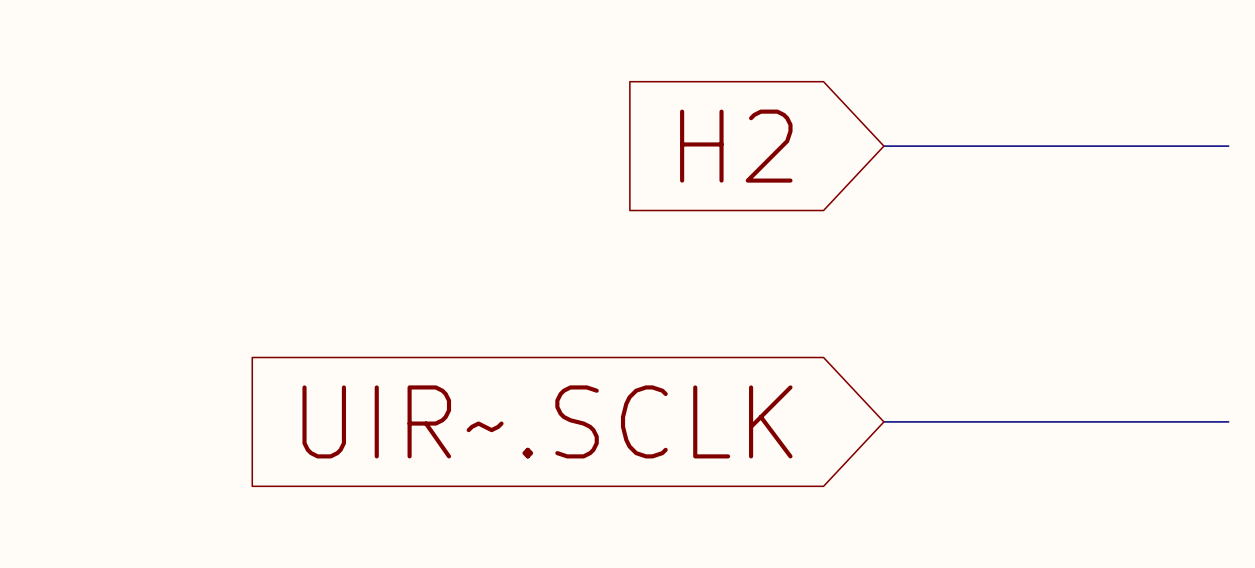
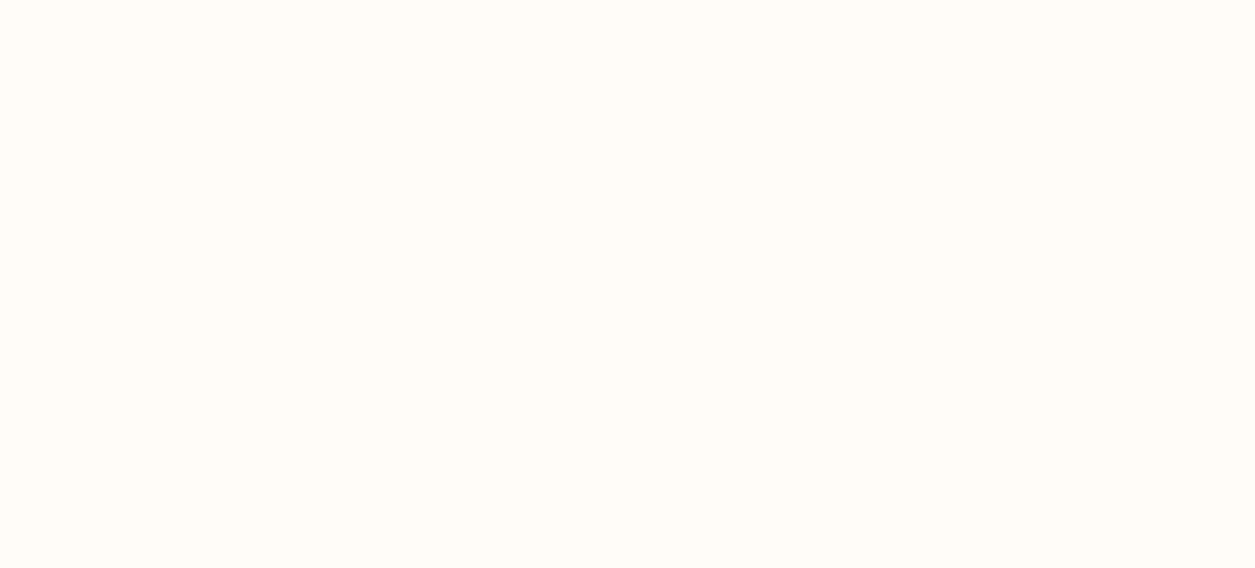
global label: H2 (736, 146) -> none
wire: (883, 146) (1228, 146) -> none
global label: UIR~.SCLK (547, 421) -> none
wire: (883, 421) (1228, 421) -> none

